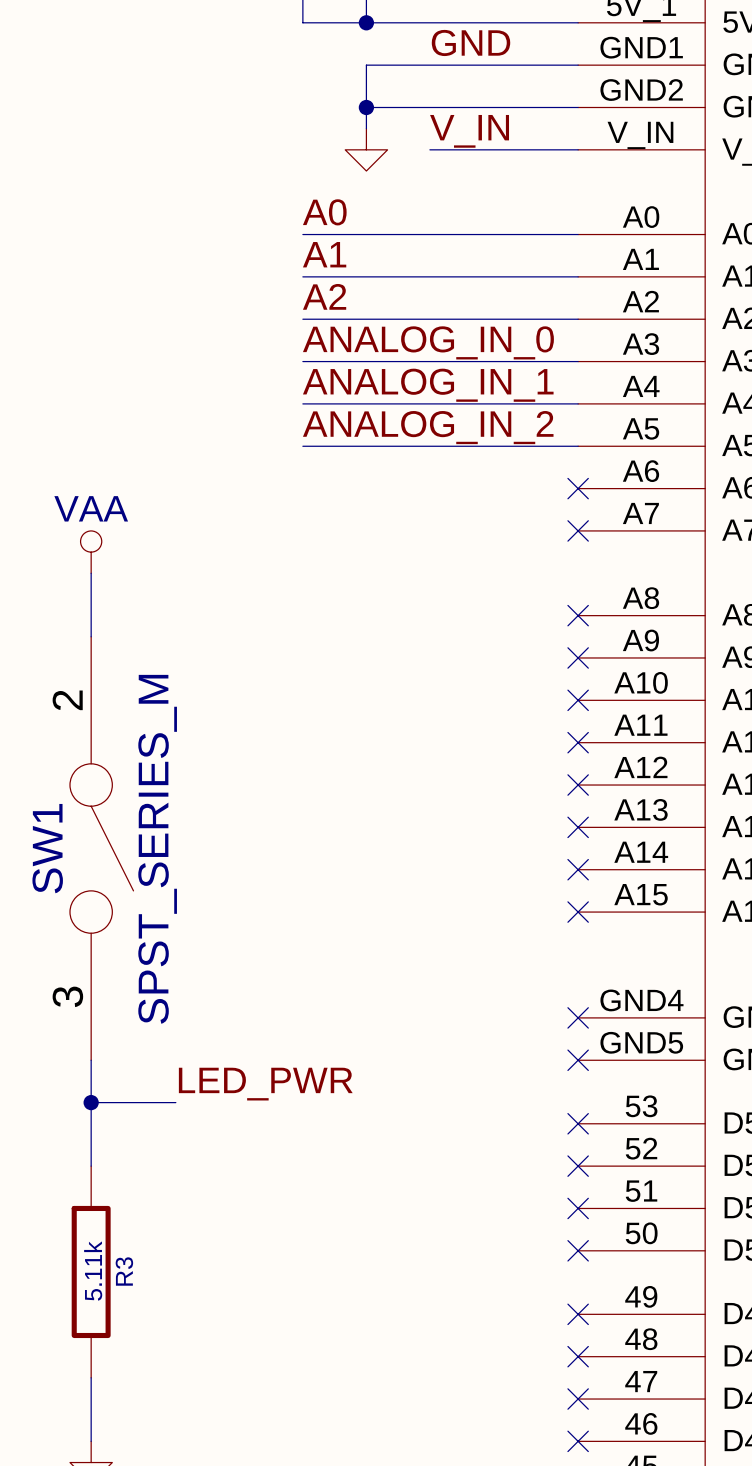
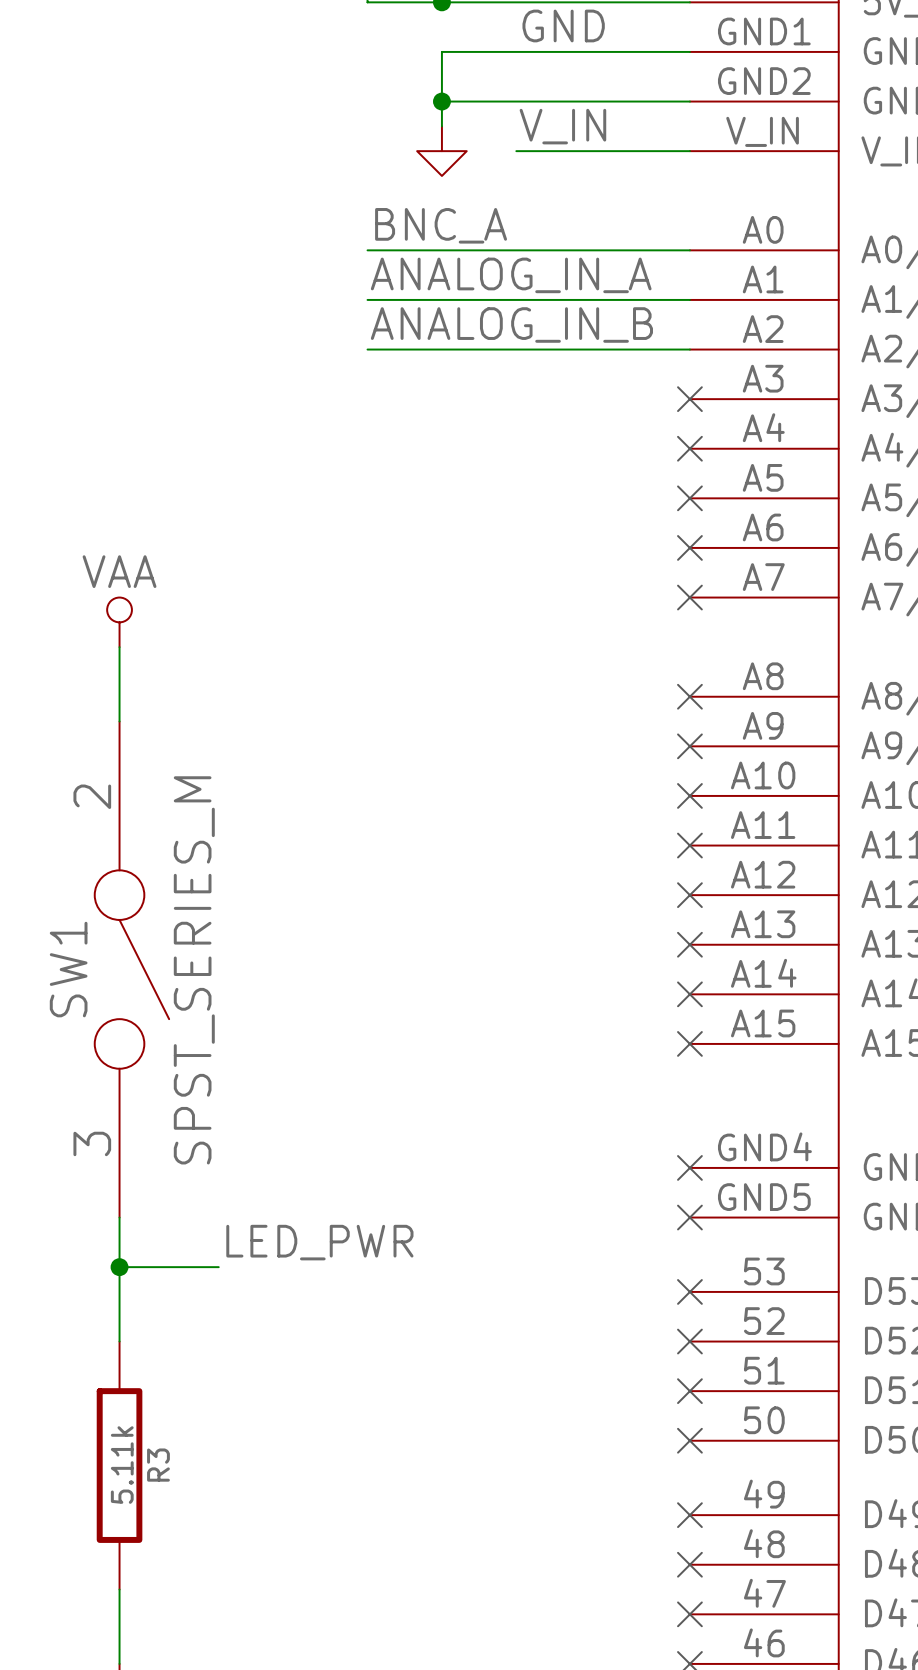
label: A0 (324, 212) -> BNC_A (441, 225)
label: A1 (324, 254) -> ANALOG_IN_A (511, 275)
label: A2 (324, 296) -> ANALOG_IN_B (511, 325)
label: ANALOG_IN_0 (428, 342) -> none
wire: (302, 361) (578, 361) -> none
no-connect mark: none -> (689, 399)
label: ANALOG_IN_1 (428, 385) -> none
wire: (302, 403) (578, 403) -> none
no-connect mark: none -> (689, 448)
label: ANALOG_IN_2 (428, 427) -> none
wire: (302, 446) (578, 446) -> none
no-connect mark: none -> (689, 498)

